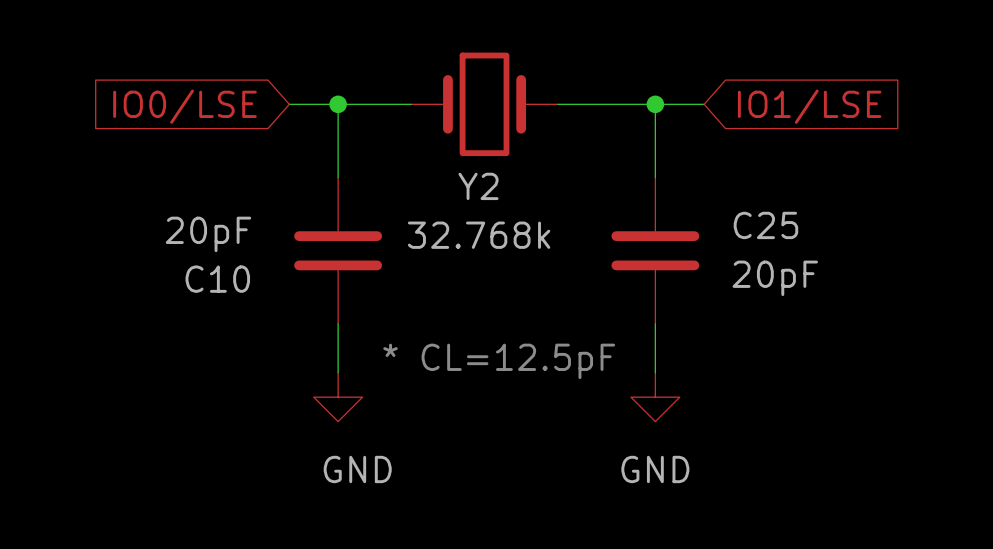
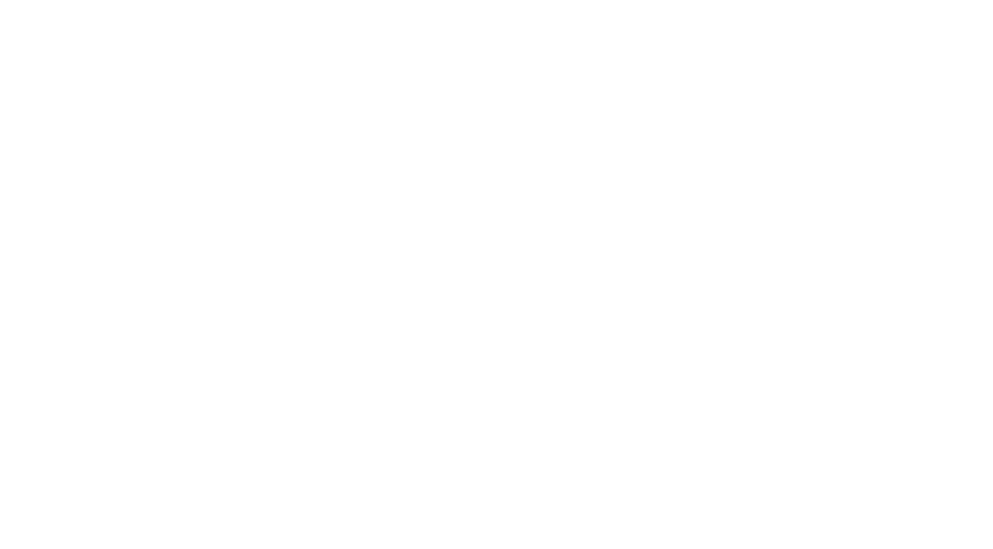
wire: (289, 104) (411, 104) -> none
wire: (338, 104) (338, 177) -> none
junction: (338, 104) -> none
Y2: 32.768k (484, 104) -> none
wire: (557, 104) (704, 104) -> none
wire: (655, 104) (655, 177) -> none
junction: (655, 104) -> none
global label: IO0/LSE (184, 106) -> none
global label: IO1/LSE (809, 106) -> none
C10: 20pF (338, 250) -> none
C25: 20pF (655, 250) -> none
wire: (338, 323) (338, 372) -> none
wire: (655, 323) (655, 372) -> none
text: * CL=12.5pF (499, 361) -> none
power symbol: GND (338, 397) -> none
power symbol: GND (655, 397) -> none

